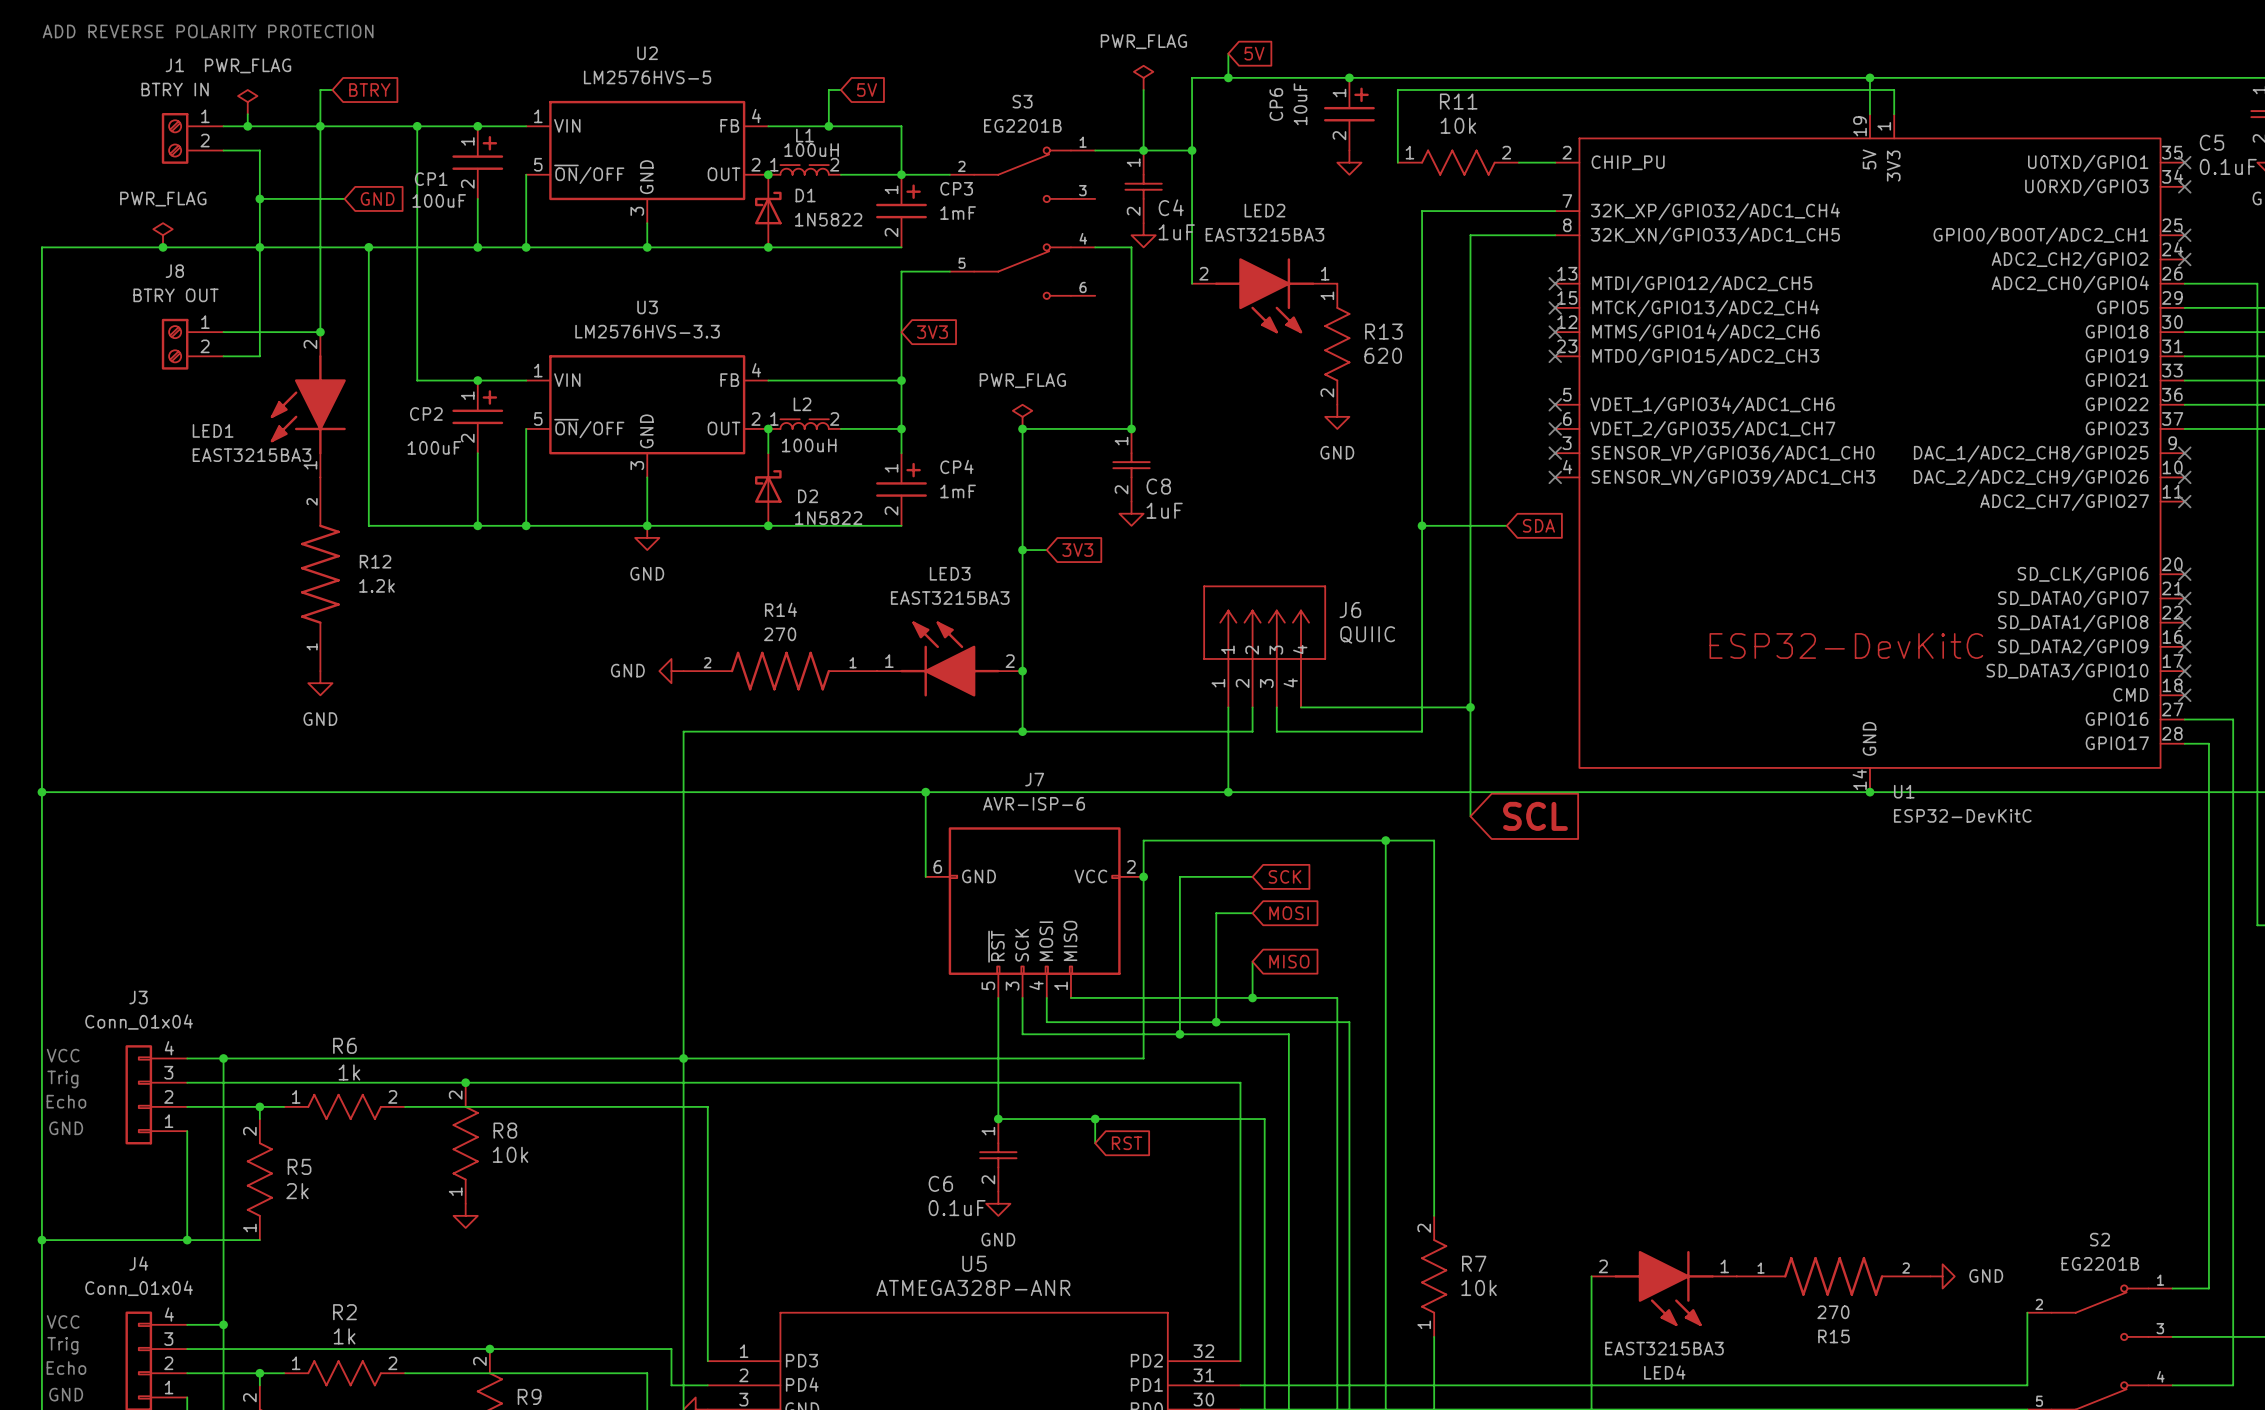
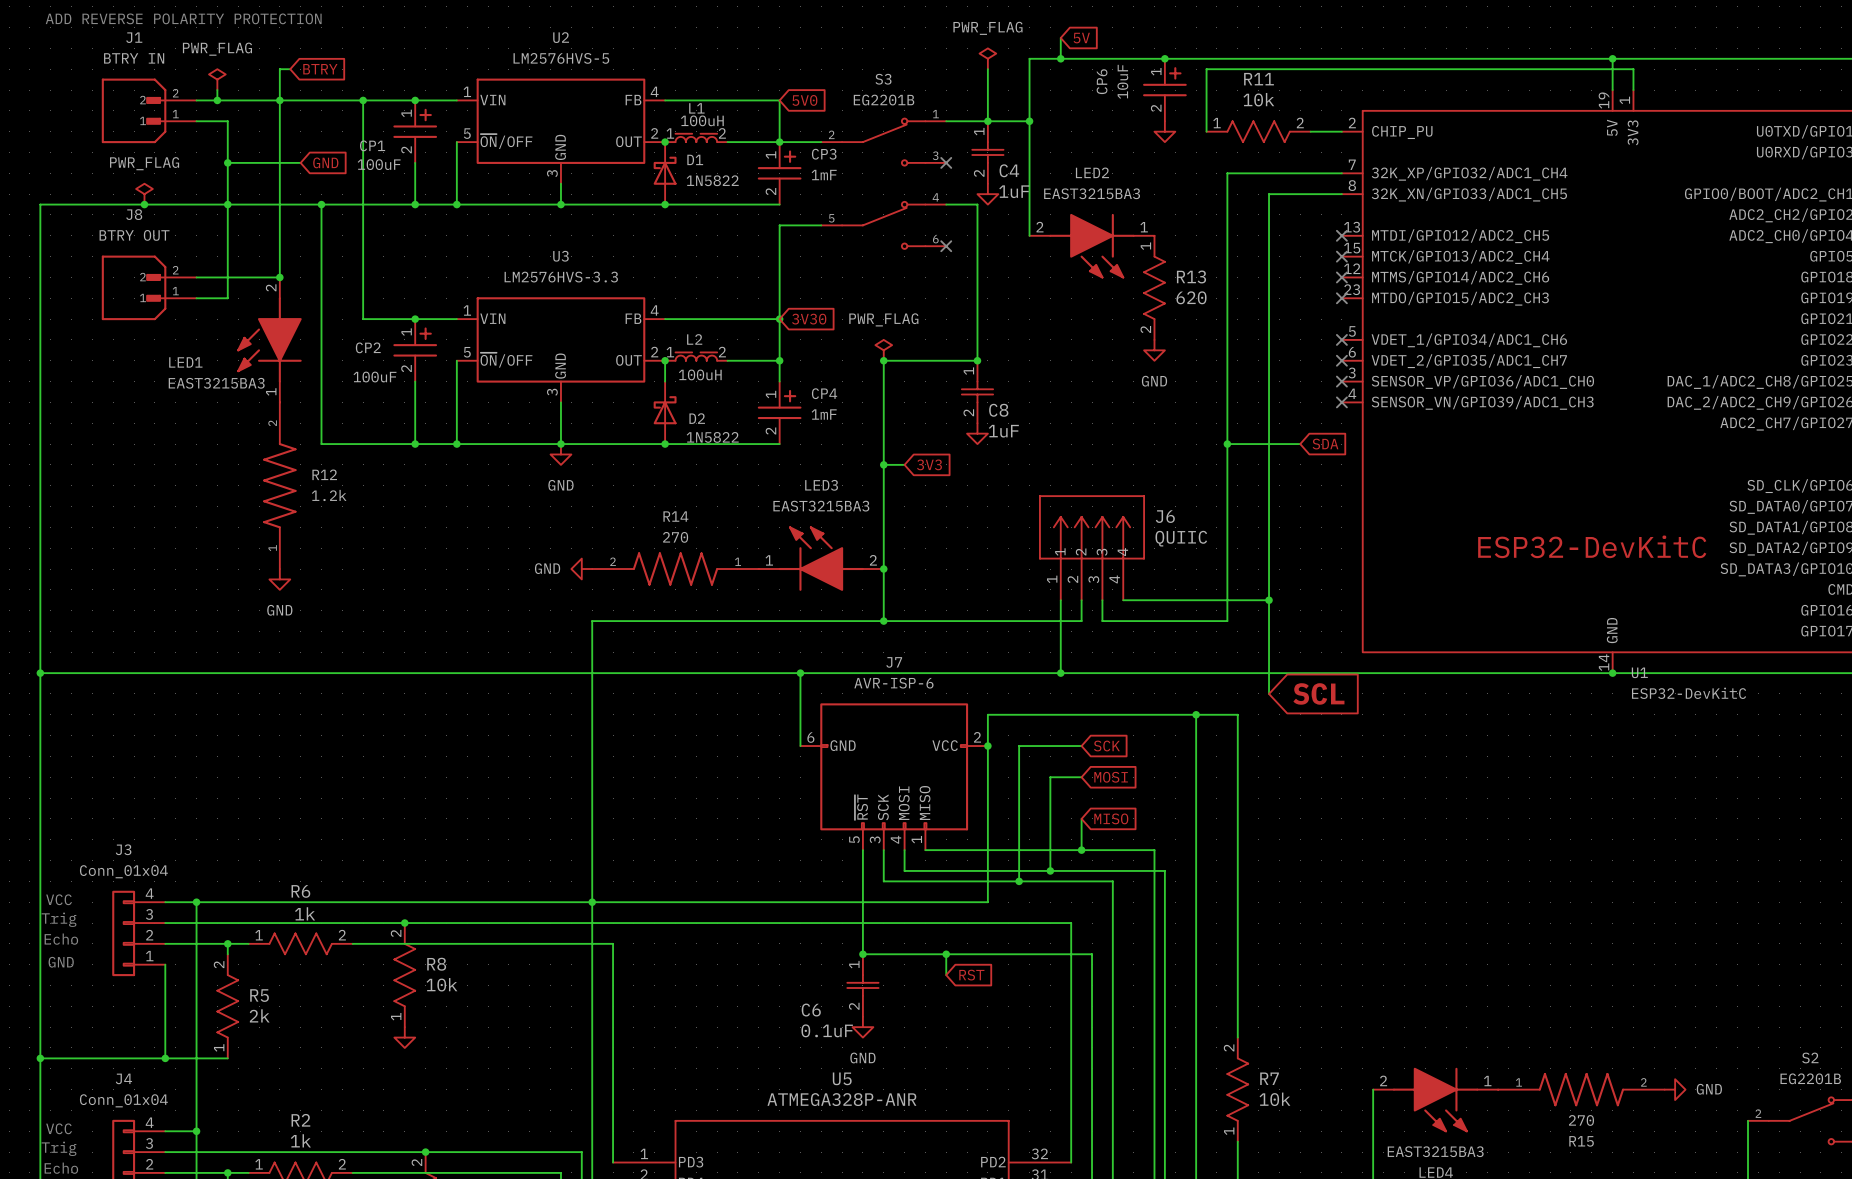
wire: (840, 90) (828, 90) (828, 126) -> none
global label: 5V (867, 90) -> none
J1 symbol: [161, 113, 224, 164] -> [101, 78, 197, 144]
junction: (828, 126) -> none
global label: none -> 5V0 (804, 100)
no-connect mark: none -> (946, 162)
no-connect mark: none -> (946, 246)
J8 symbol: [161, 318, 224, 370] -> [101, 255, 197, 321]
global label: 3V3 (932, 332) -> none
global label: none -> 3V30 (809, 319)

